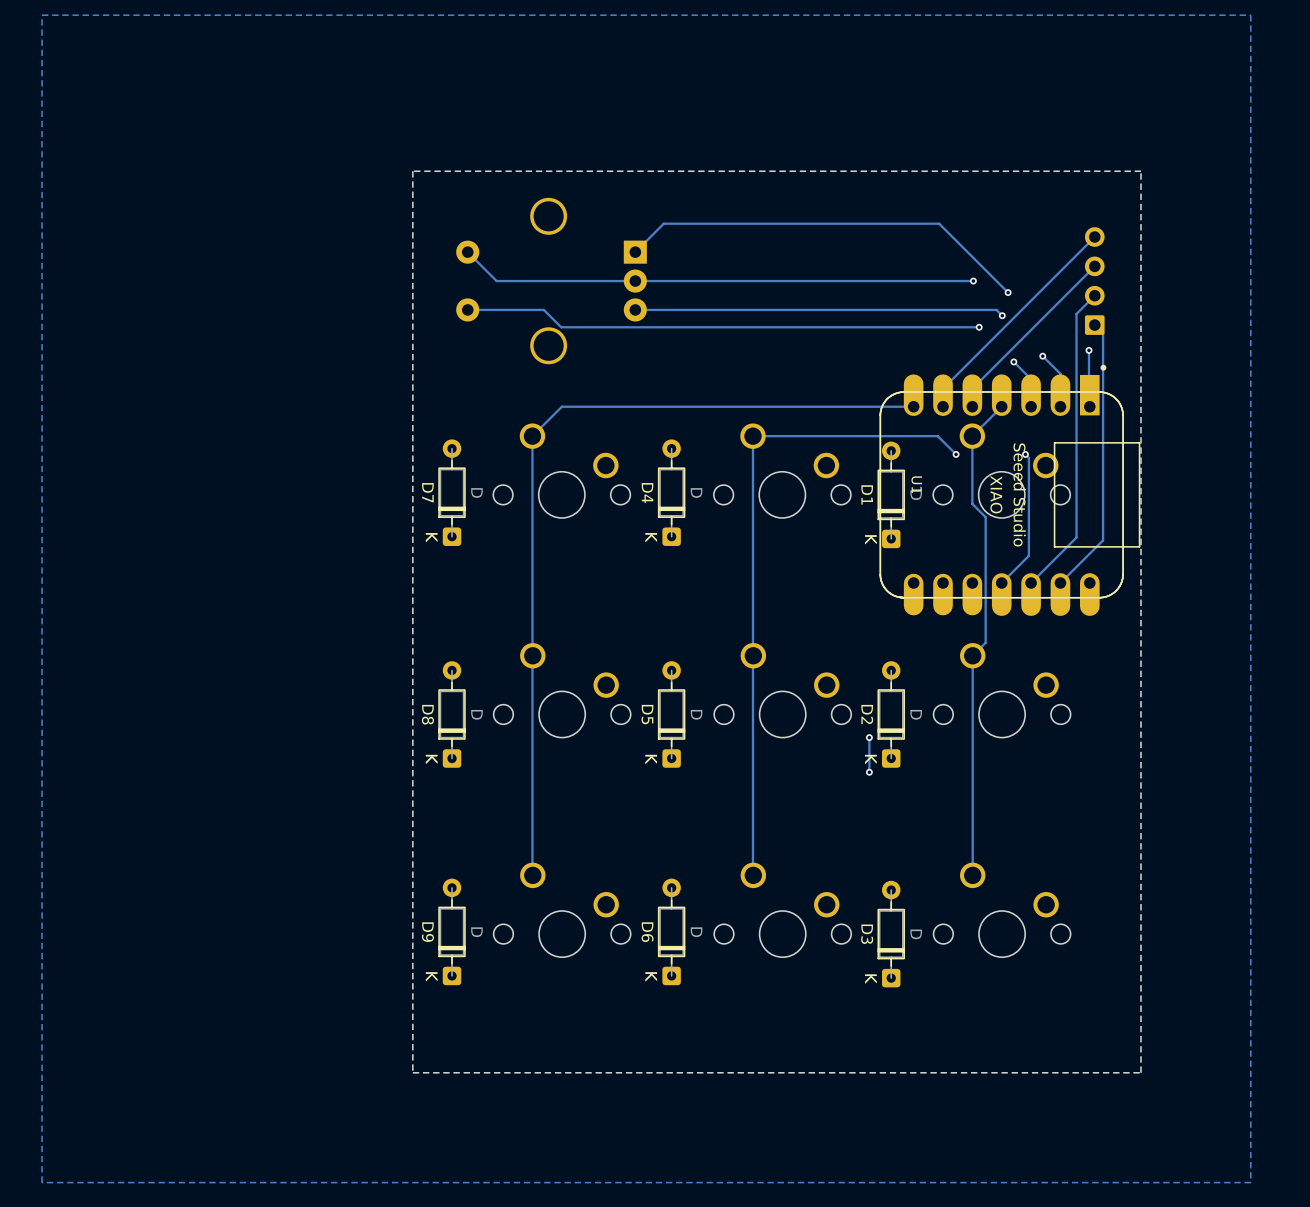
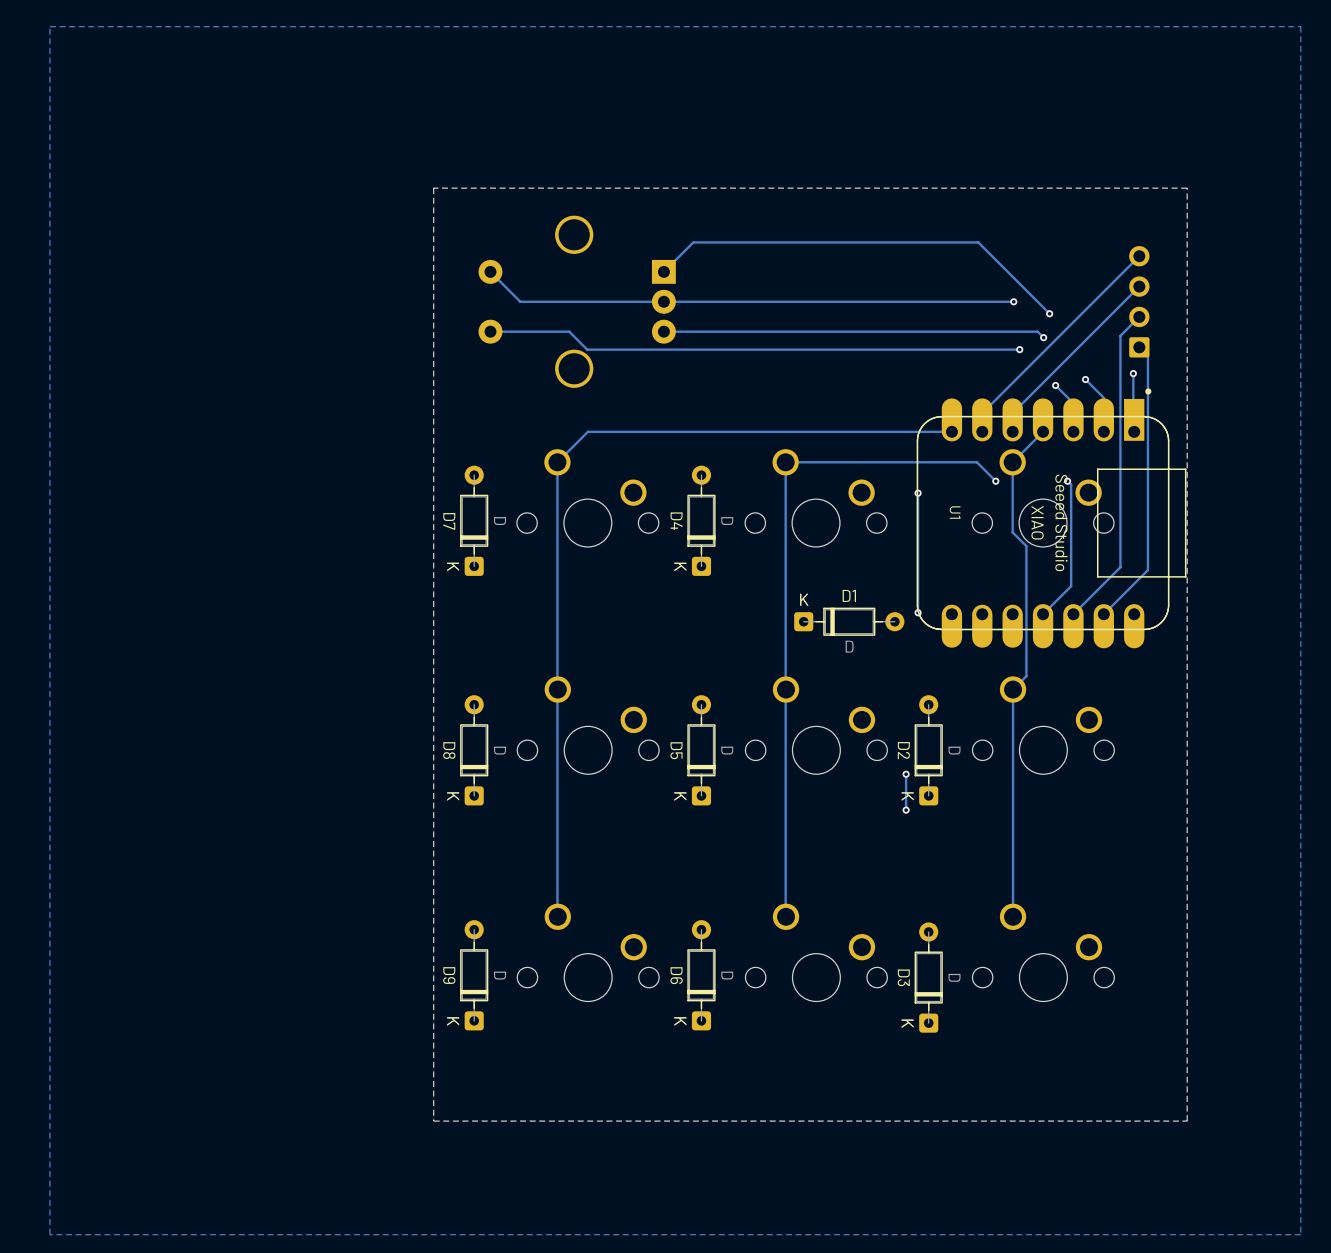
track: none -> (918, 493) (918, 612)
via: none -> (918, 493)
D1 rotation: 0° (891, 494) -> 90° clockwise (849, 621)
D1 position: (891, 494) -> (849, 621)
via: none -> (918, 612)

